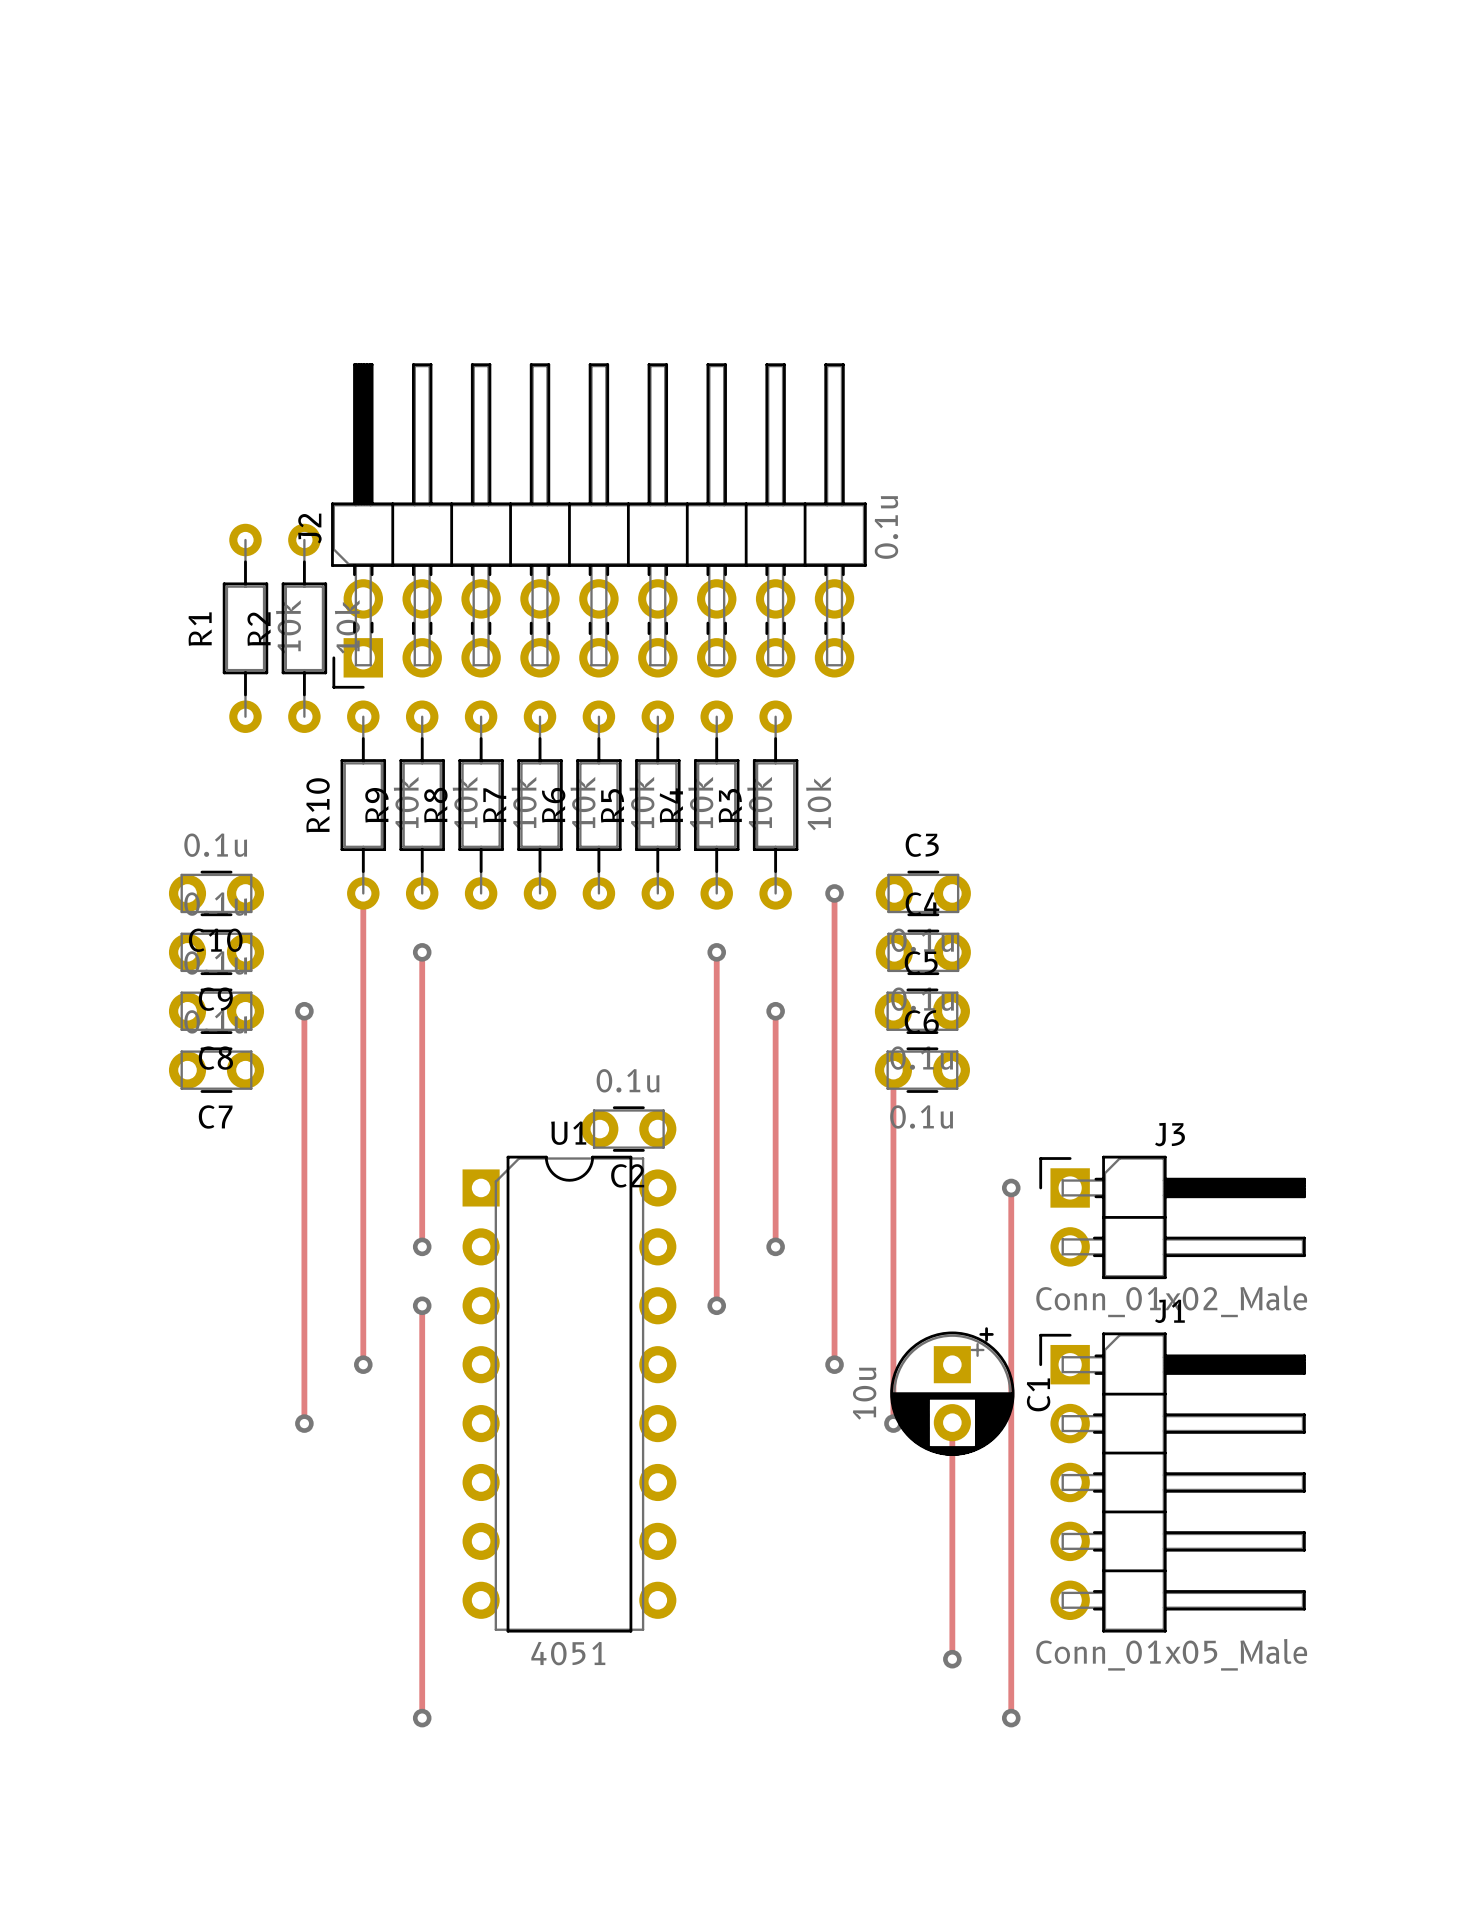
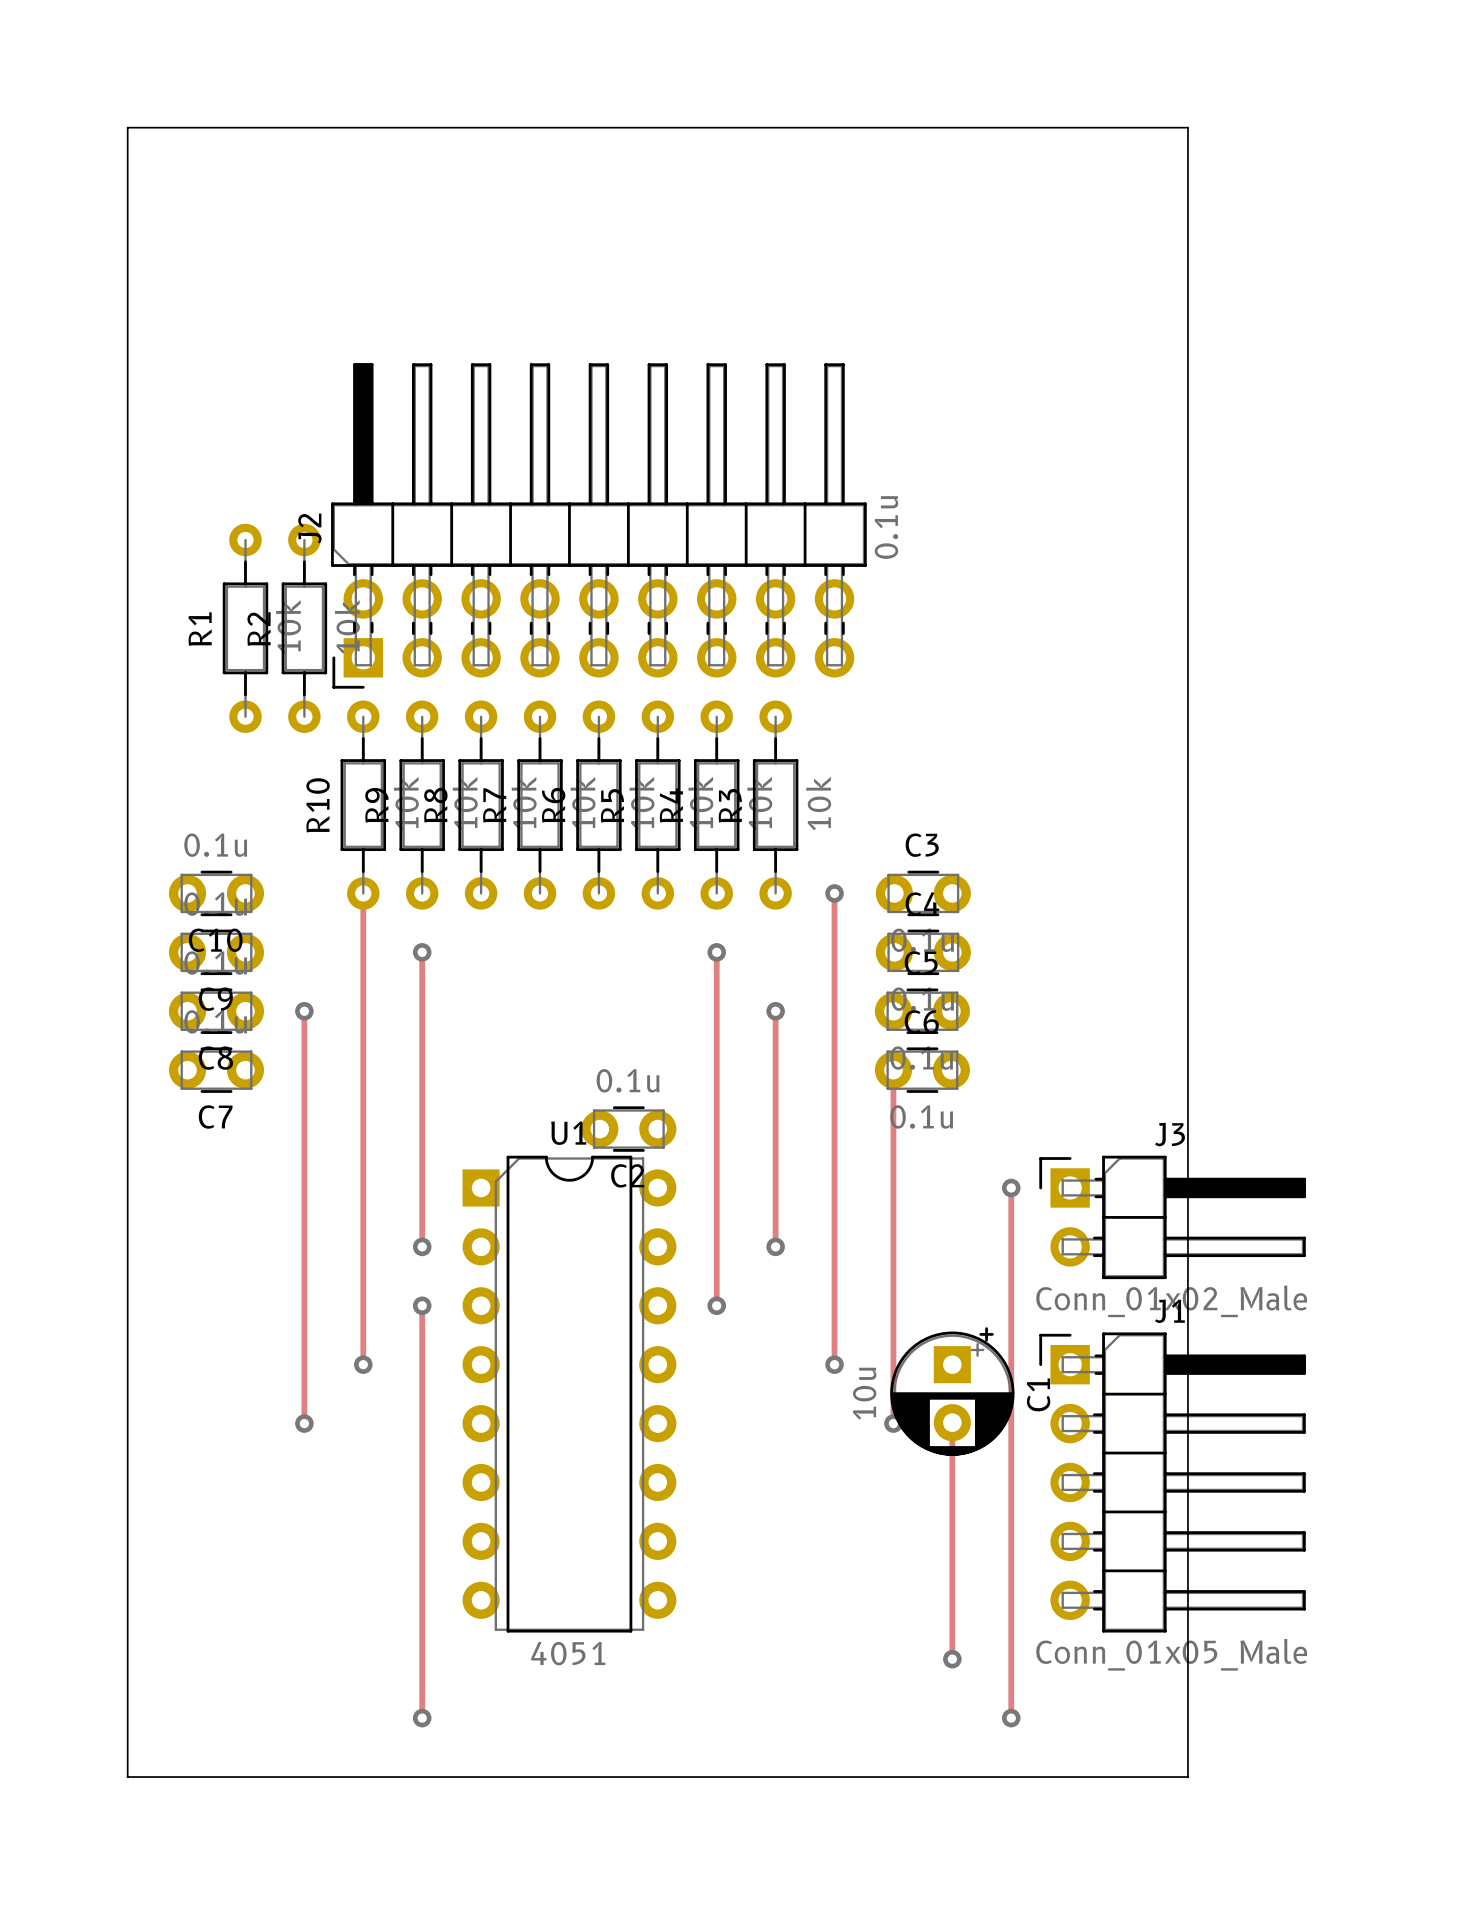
board edge: none -> (127, 127) (127, 1777) (1187, 1777) (1187, 127) (127, 127)

